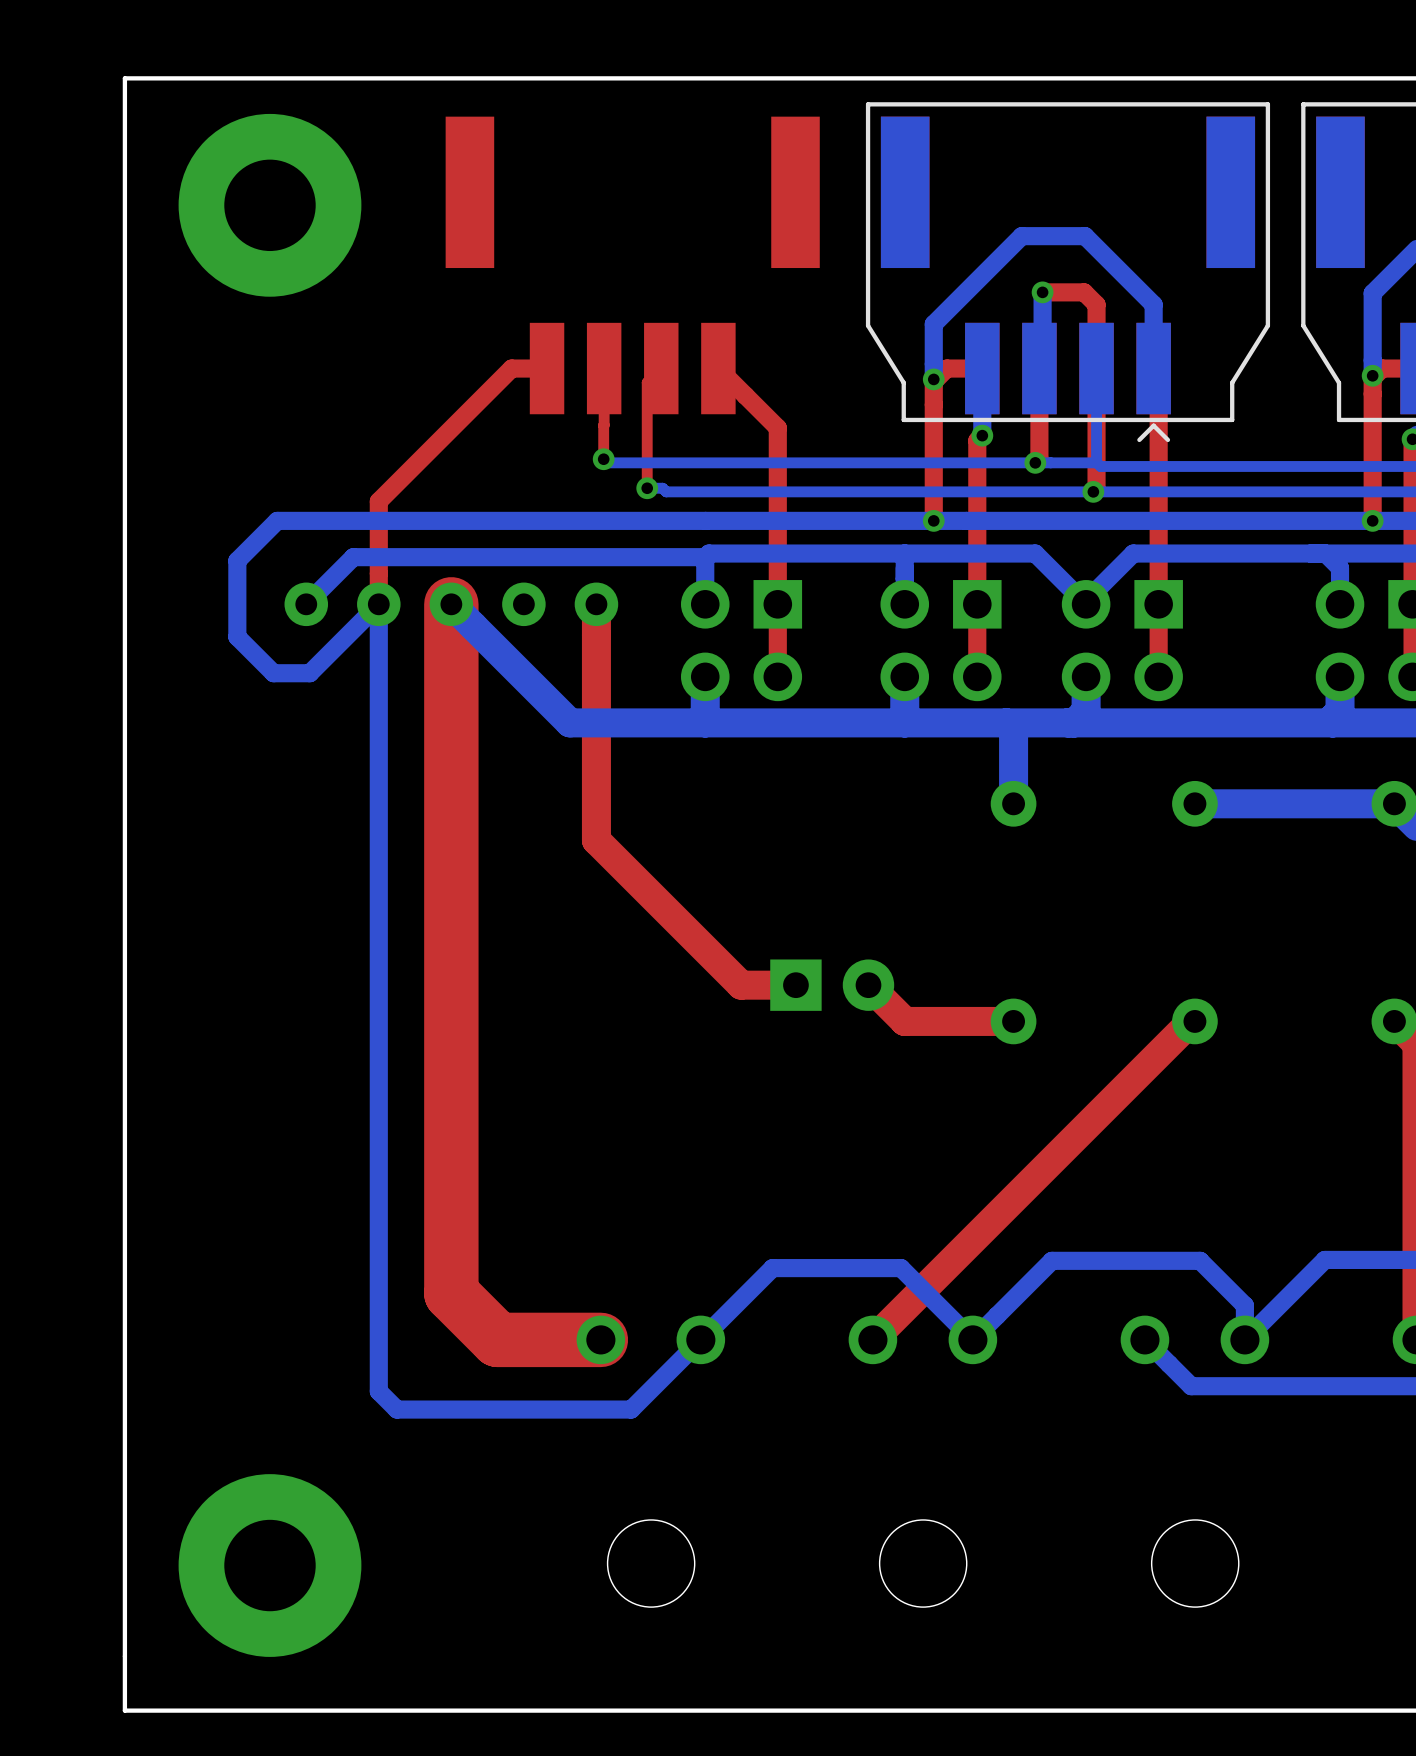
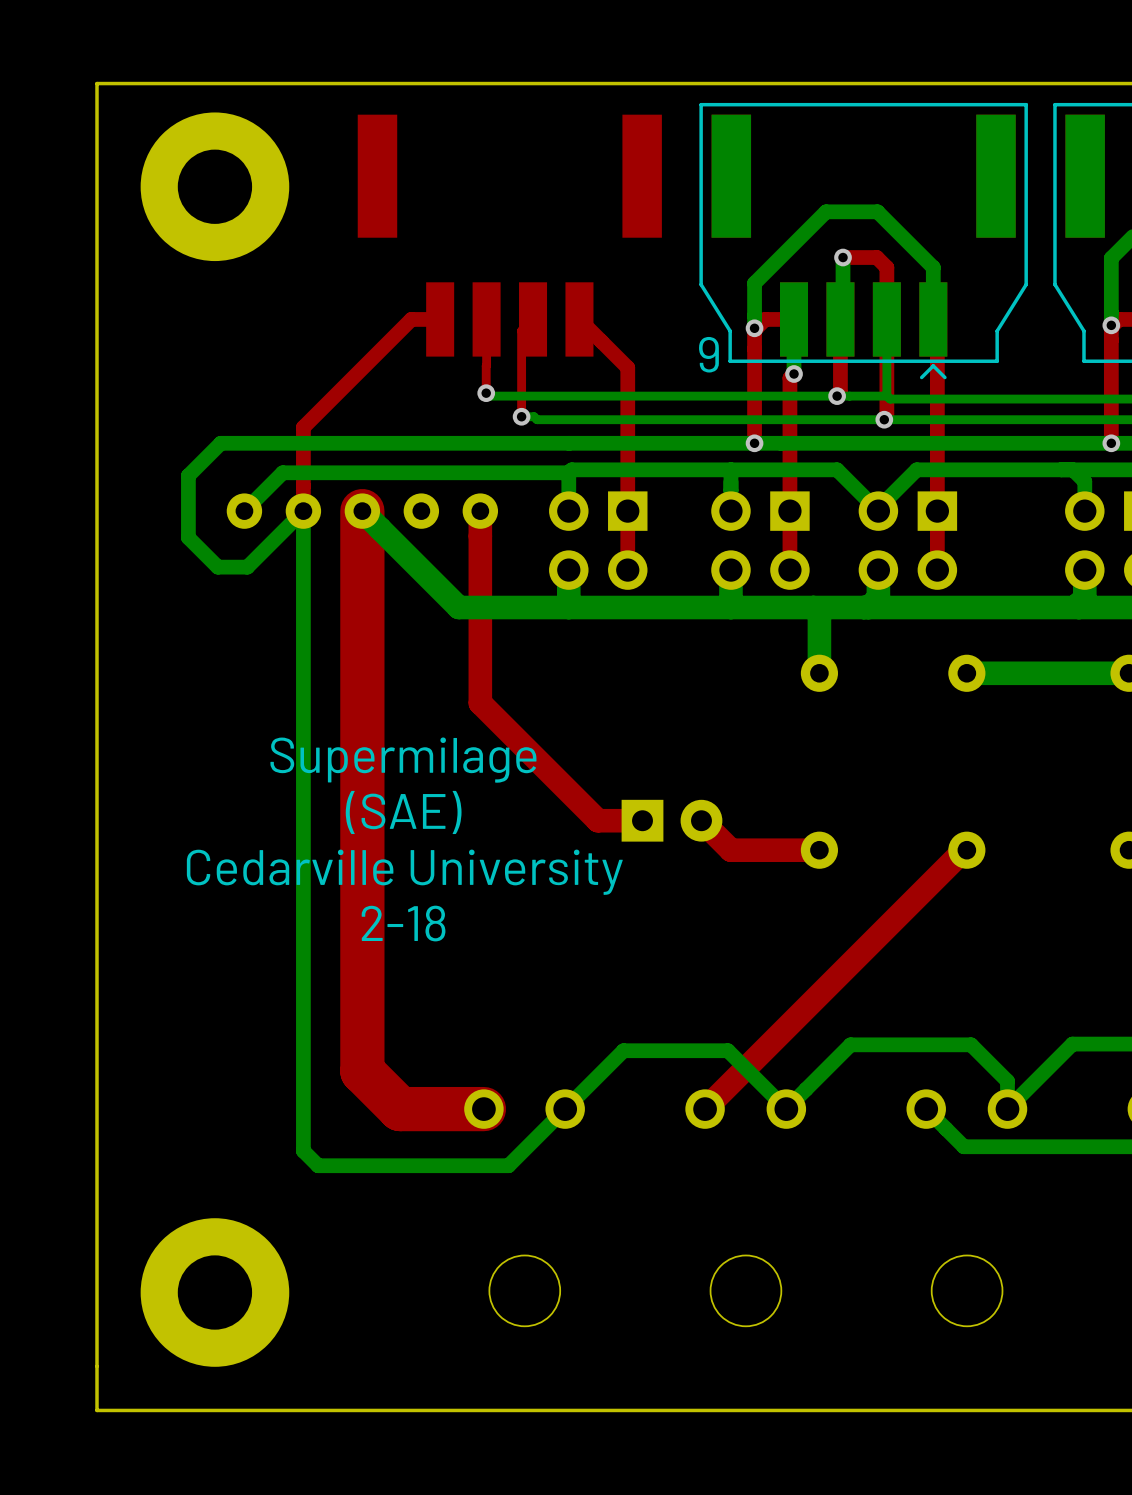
text: none -> 9 (708, 354)
text: none -> Supermilage (403, 760)
text: none -> (SAE) (403, 812)
text: none -> Cedarville University (404, 872)
text: none -> 2-18 (403, 923)

